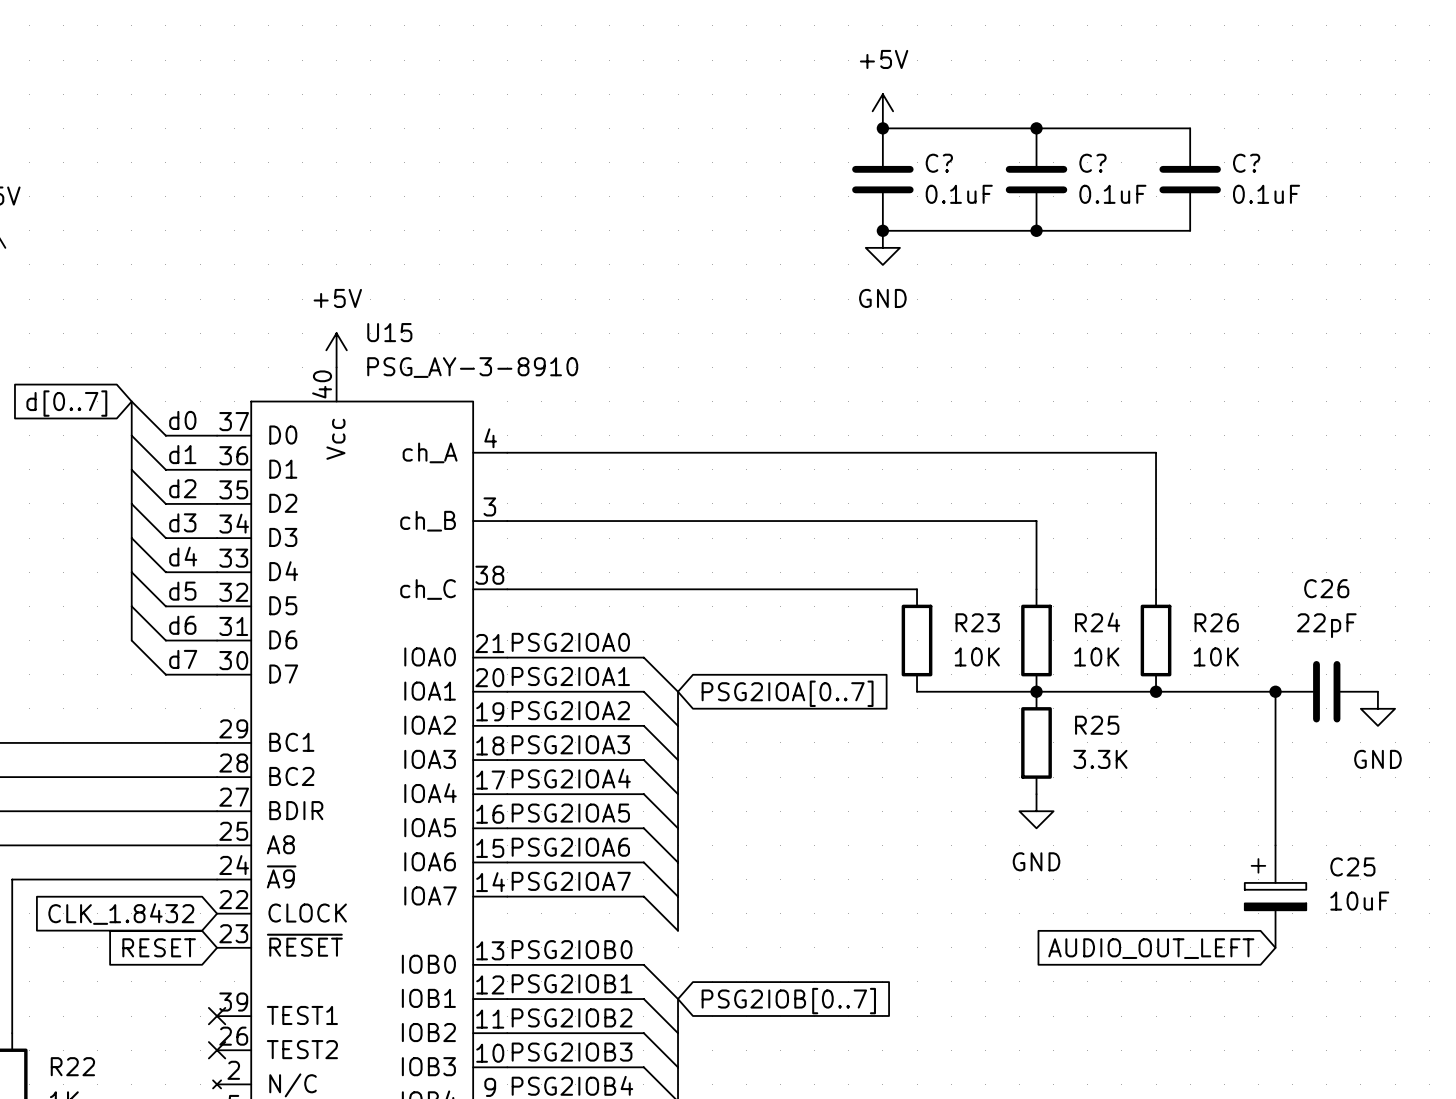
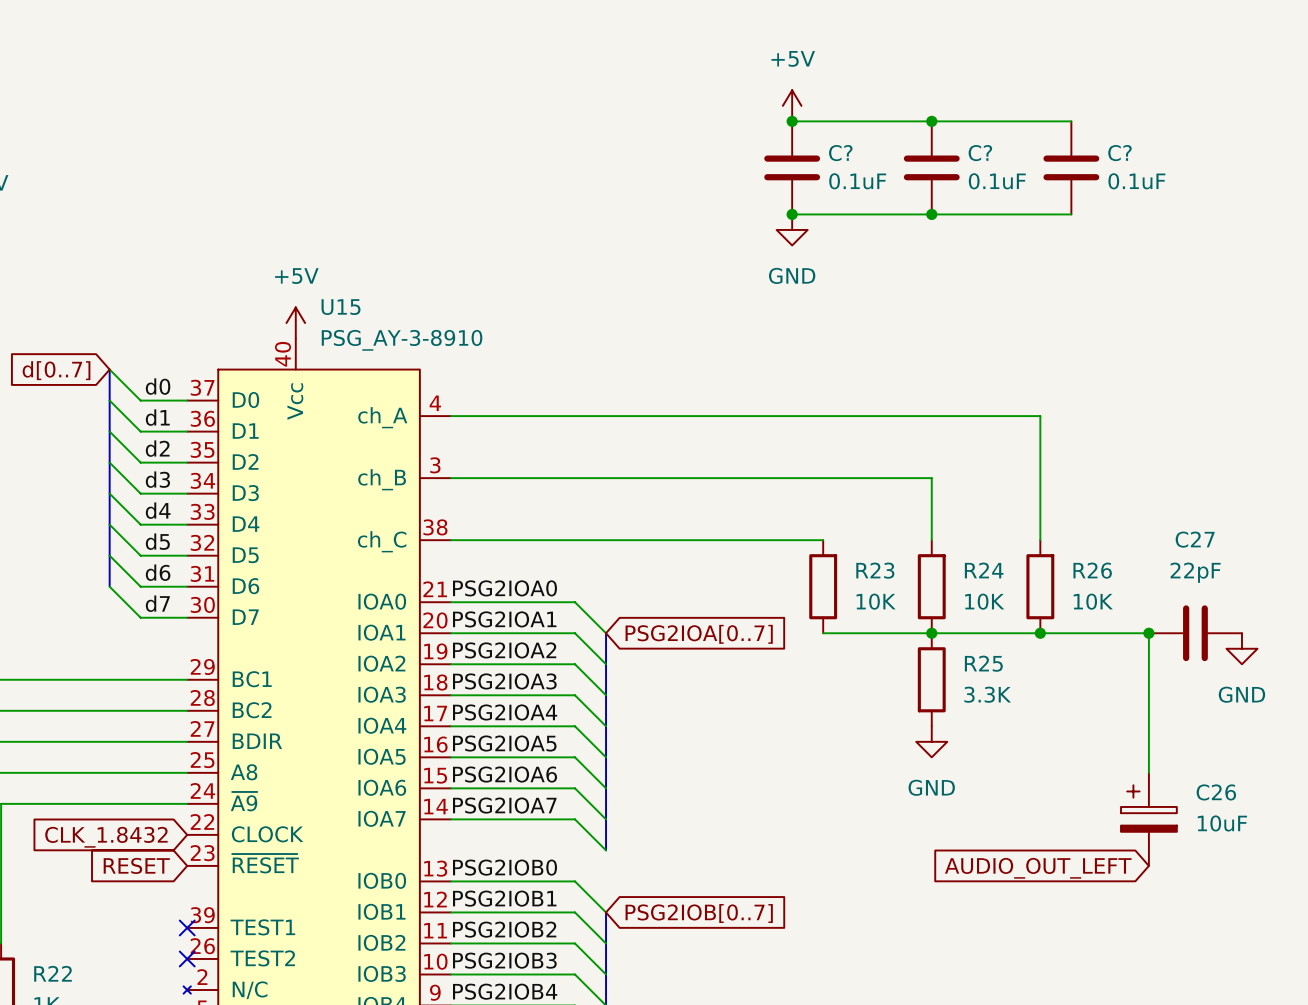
C26 name: C26 (1326, 588) -> C27 (1195, 539)
C25 name: C25 (1352, 866) -> C26 (1216, 792)

